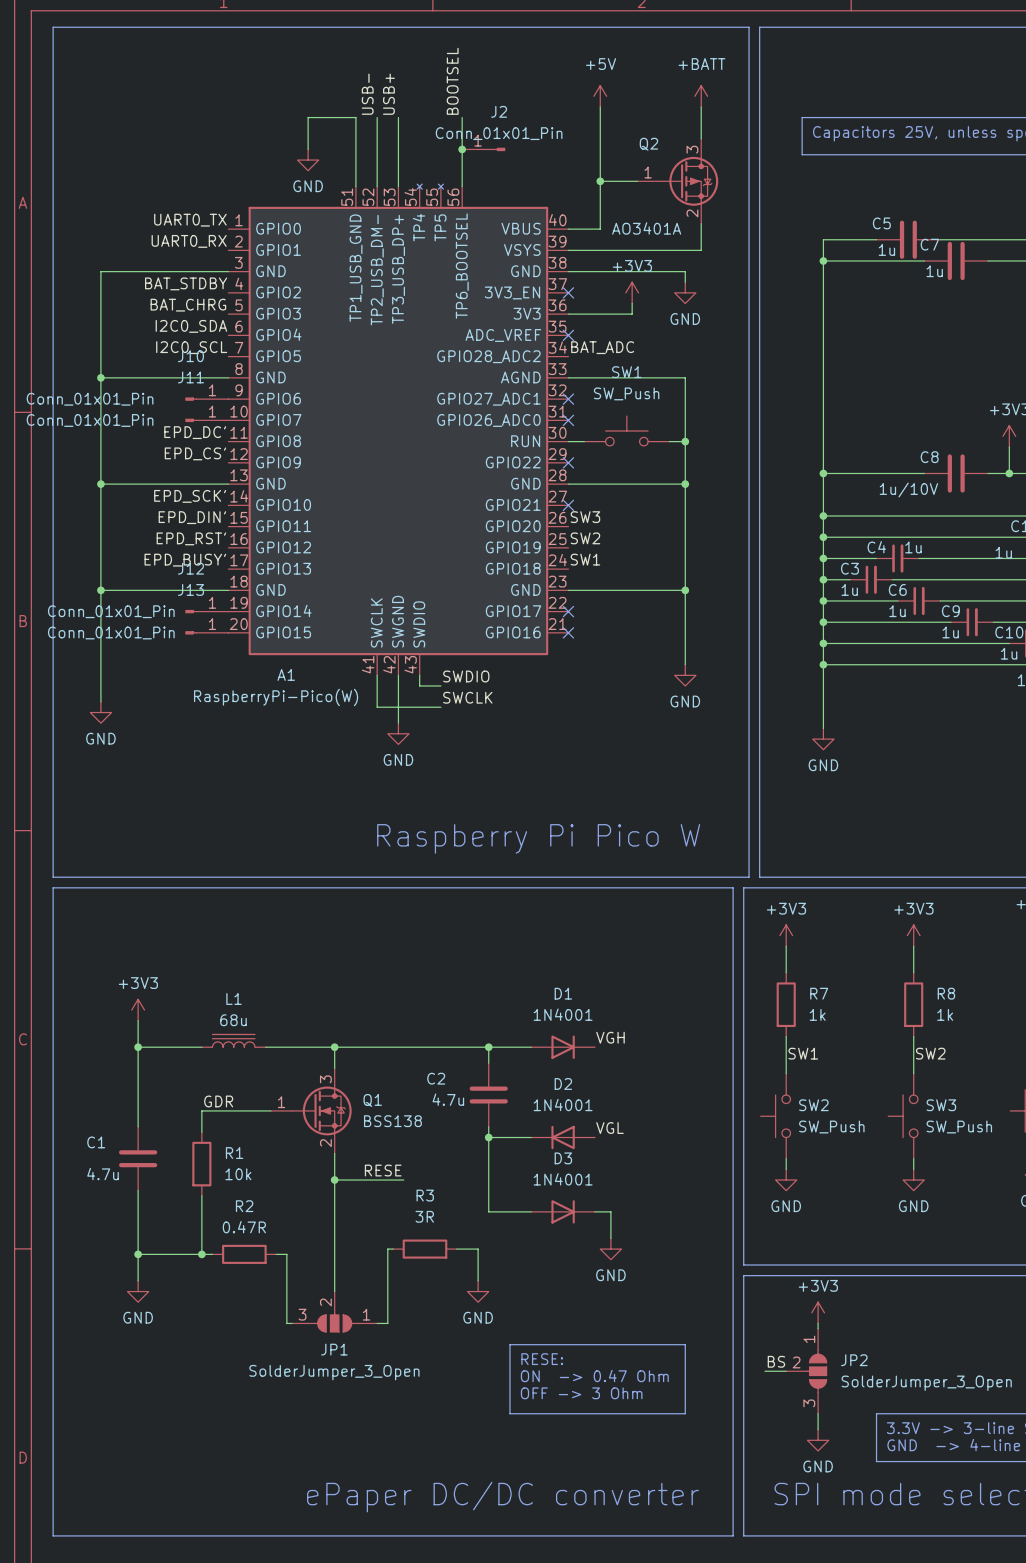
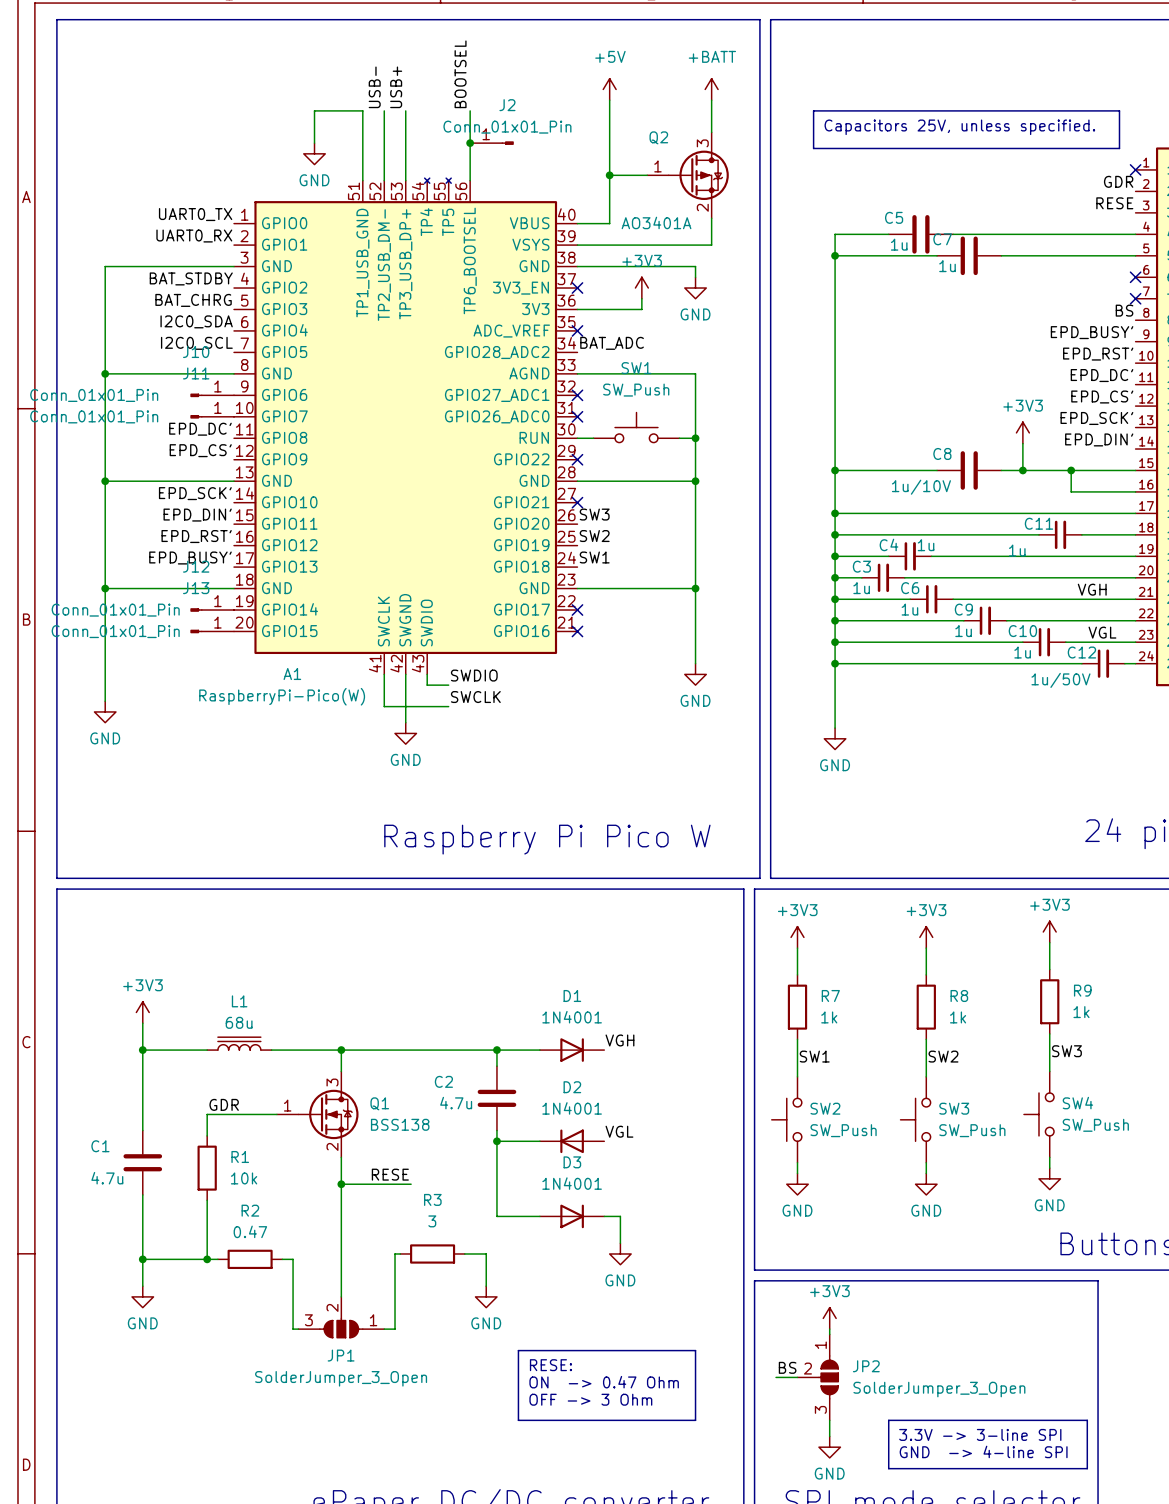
R3 value: 3R (424, 1216) -> 3 (432, 1221)
R2 value: 0.47R (244, 1227) -> 0.47 (250, 1231)

